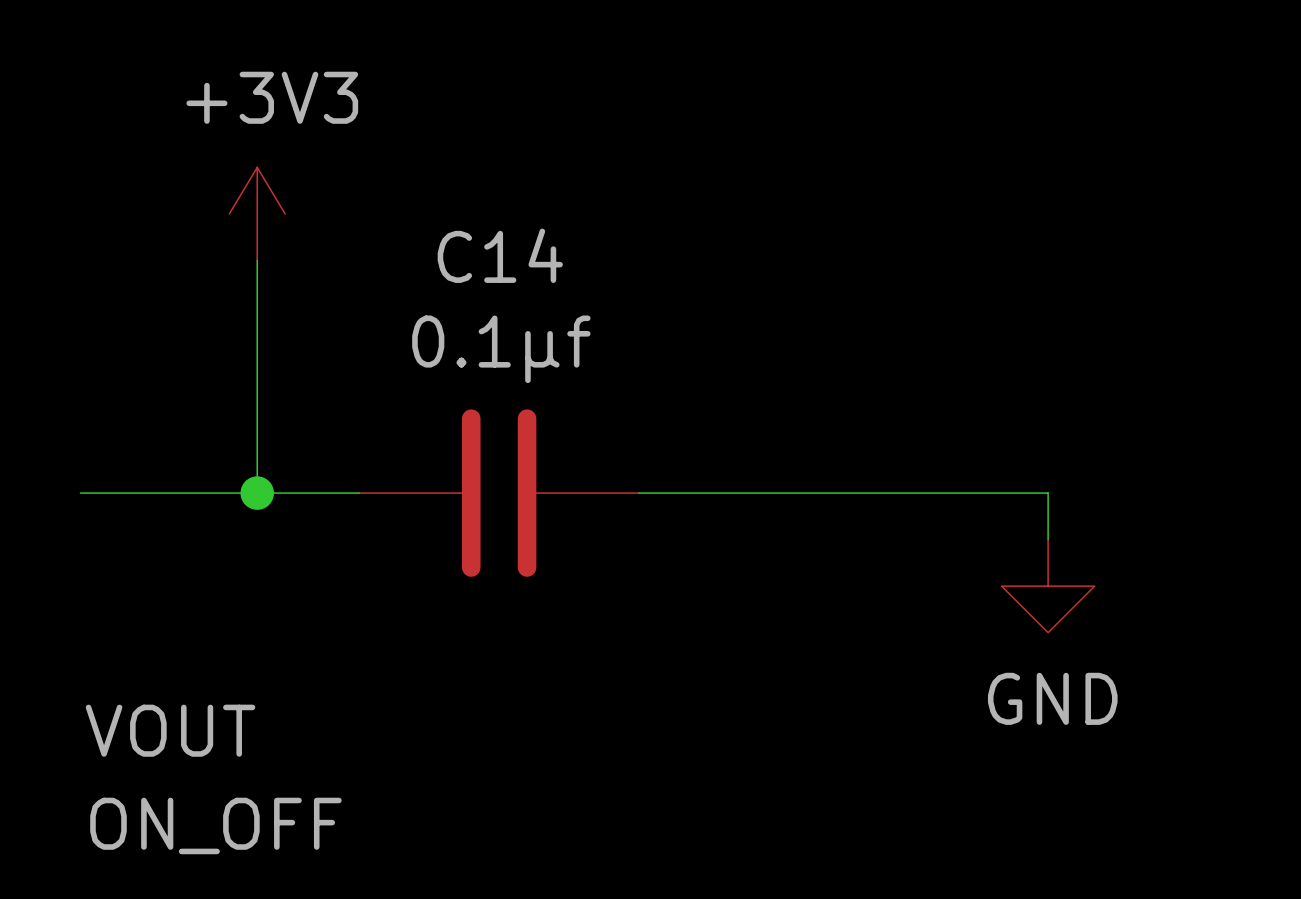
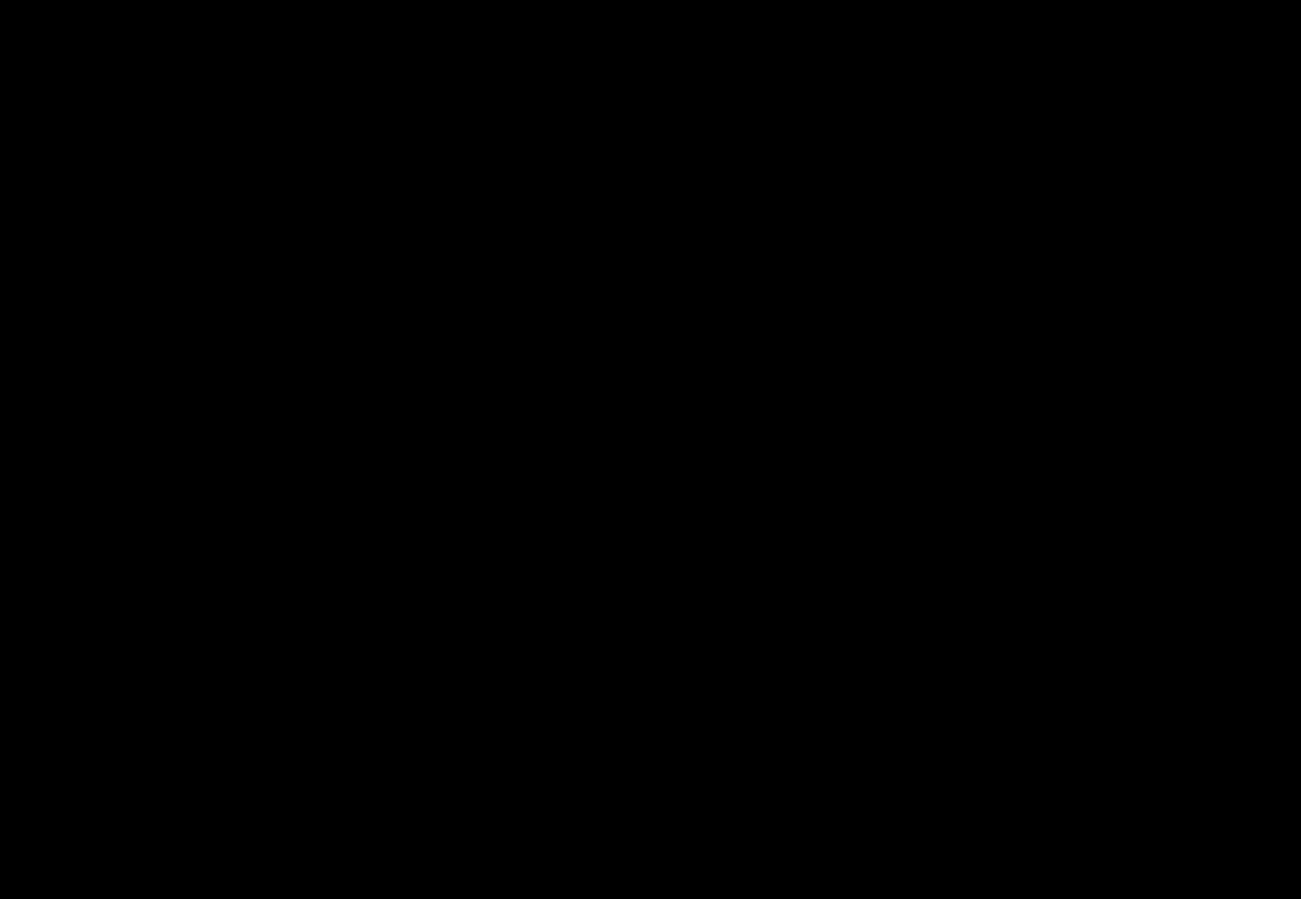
power symbol: +3V3 (257, 213) -> none
wire: (257, 260) (257, 493) -> none
wire: (80, 493) (359, 493) -> none
junction: (257, 493) -> none
C14: 0.1µf (499, 493) -> none
wire: (638, 493) (1048, 493) (1048, 539) -> none
power symbol: GND (1048, 586) -> none
label: VOUT (170, 730) -> none
label: ON_OFF (215, 825) -> none

